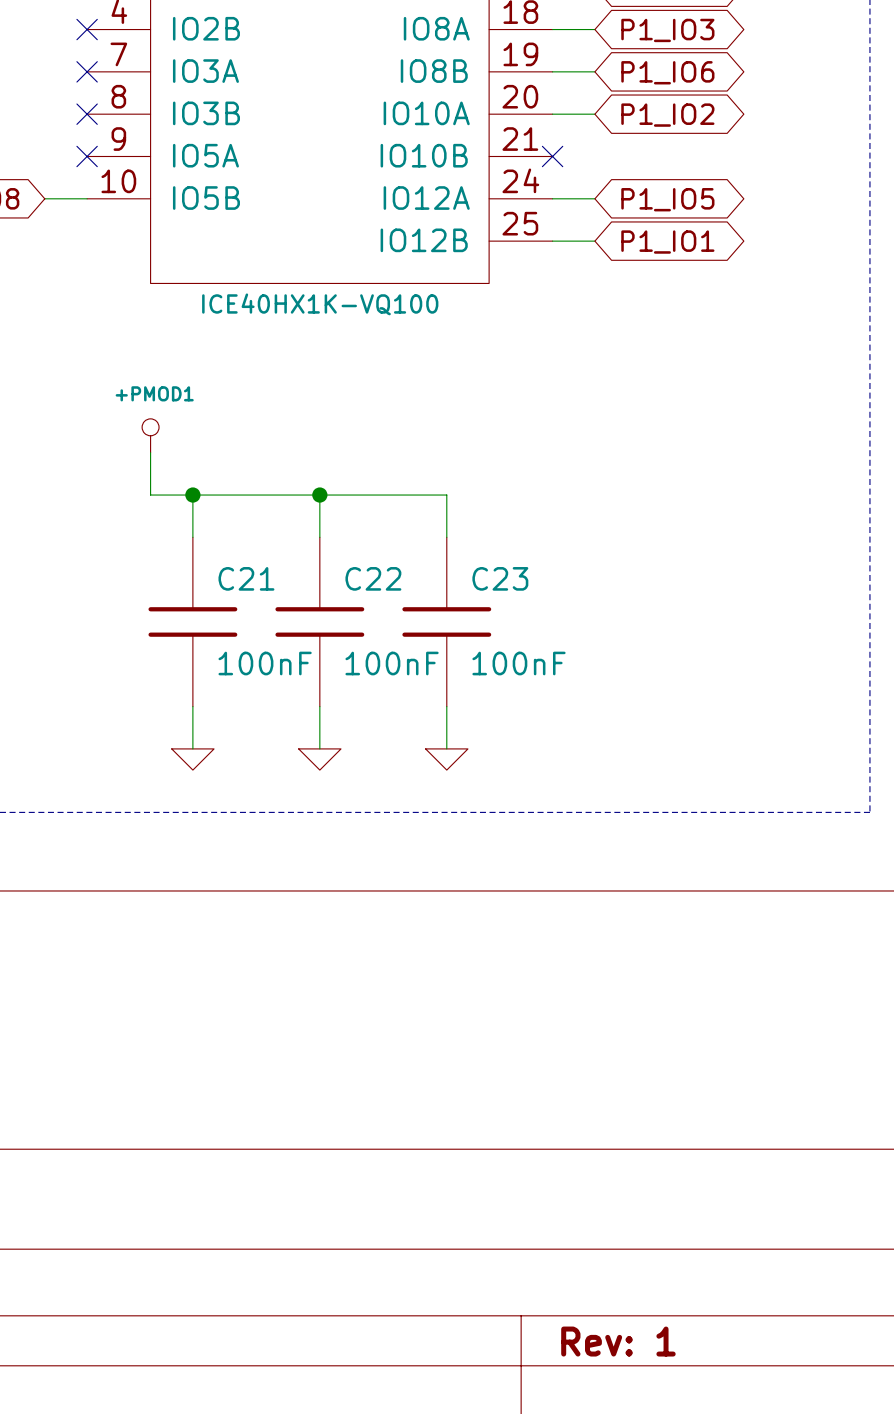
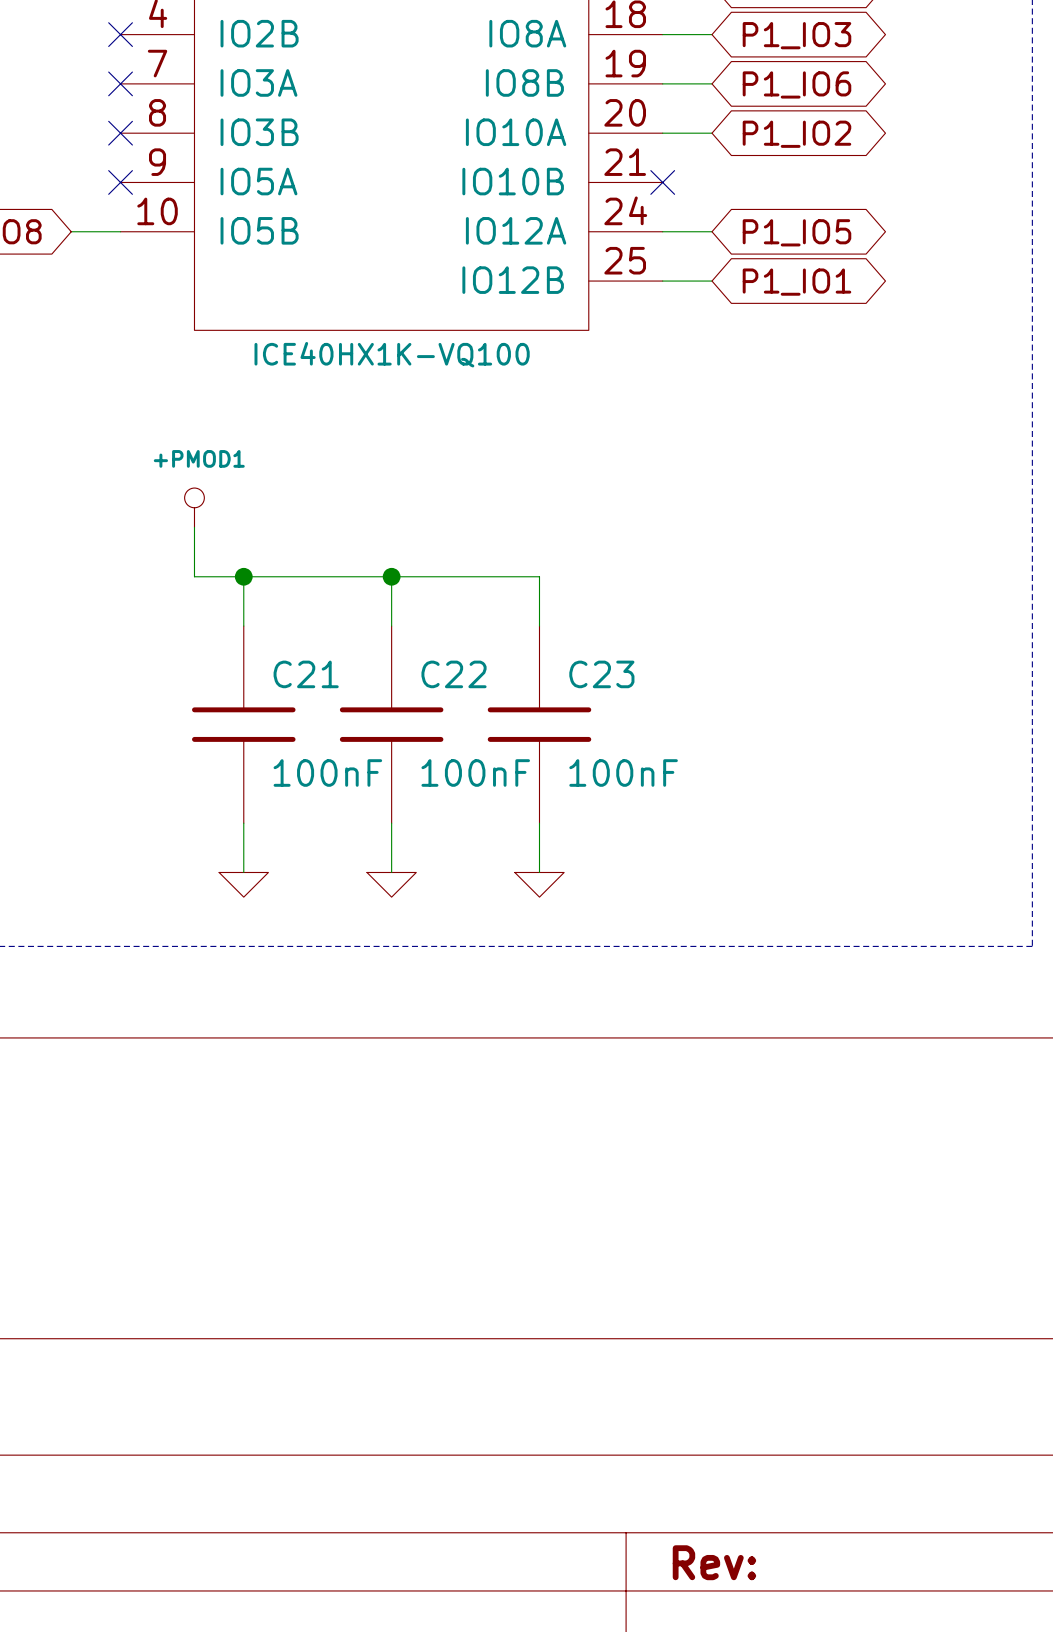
title block: Rev: 1 (618, 1341) -> Rev: (714, 1562)

